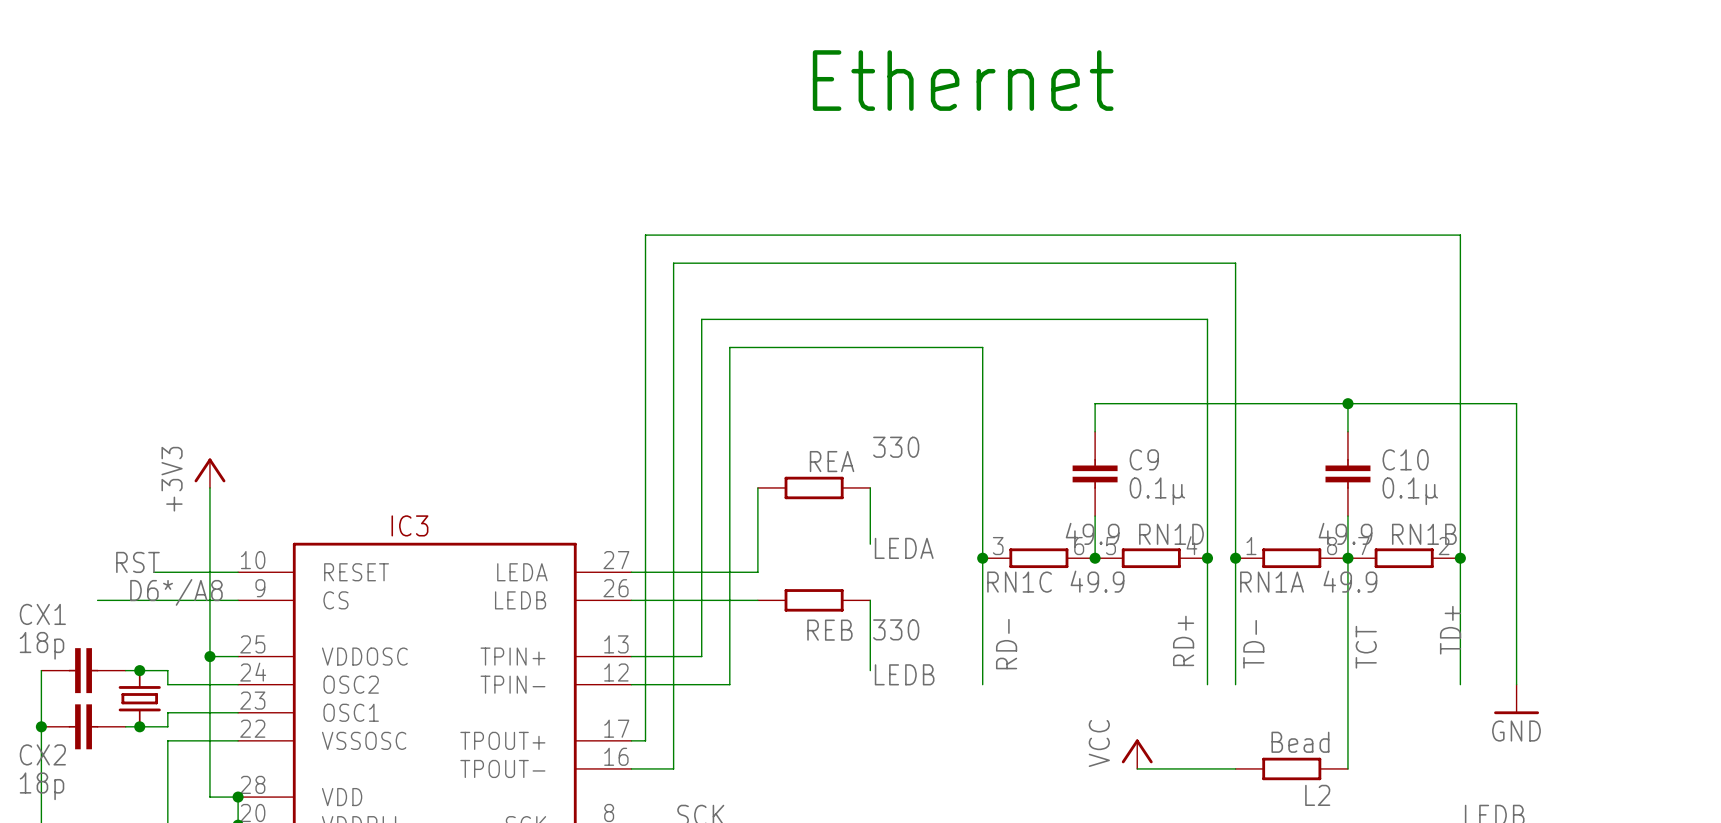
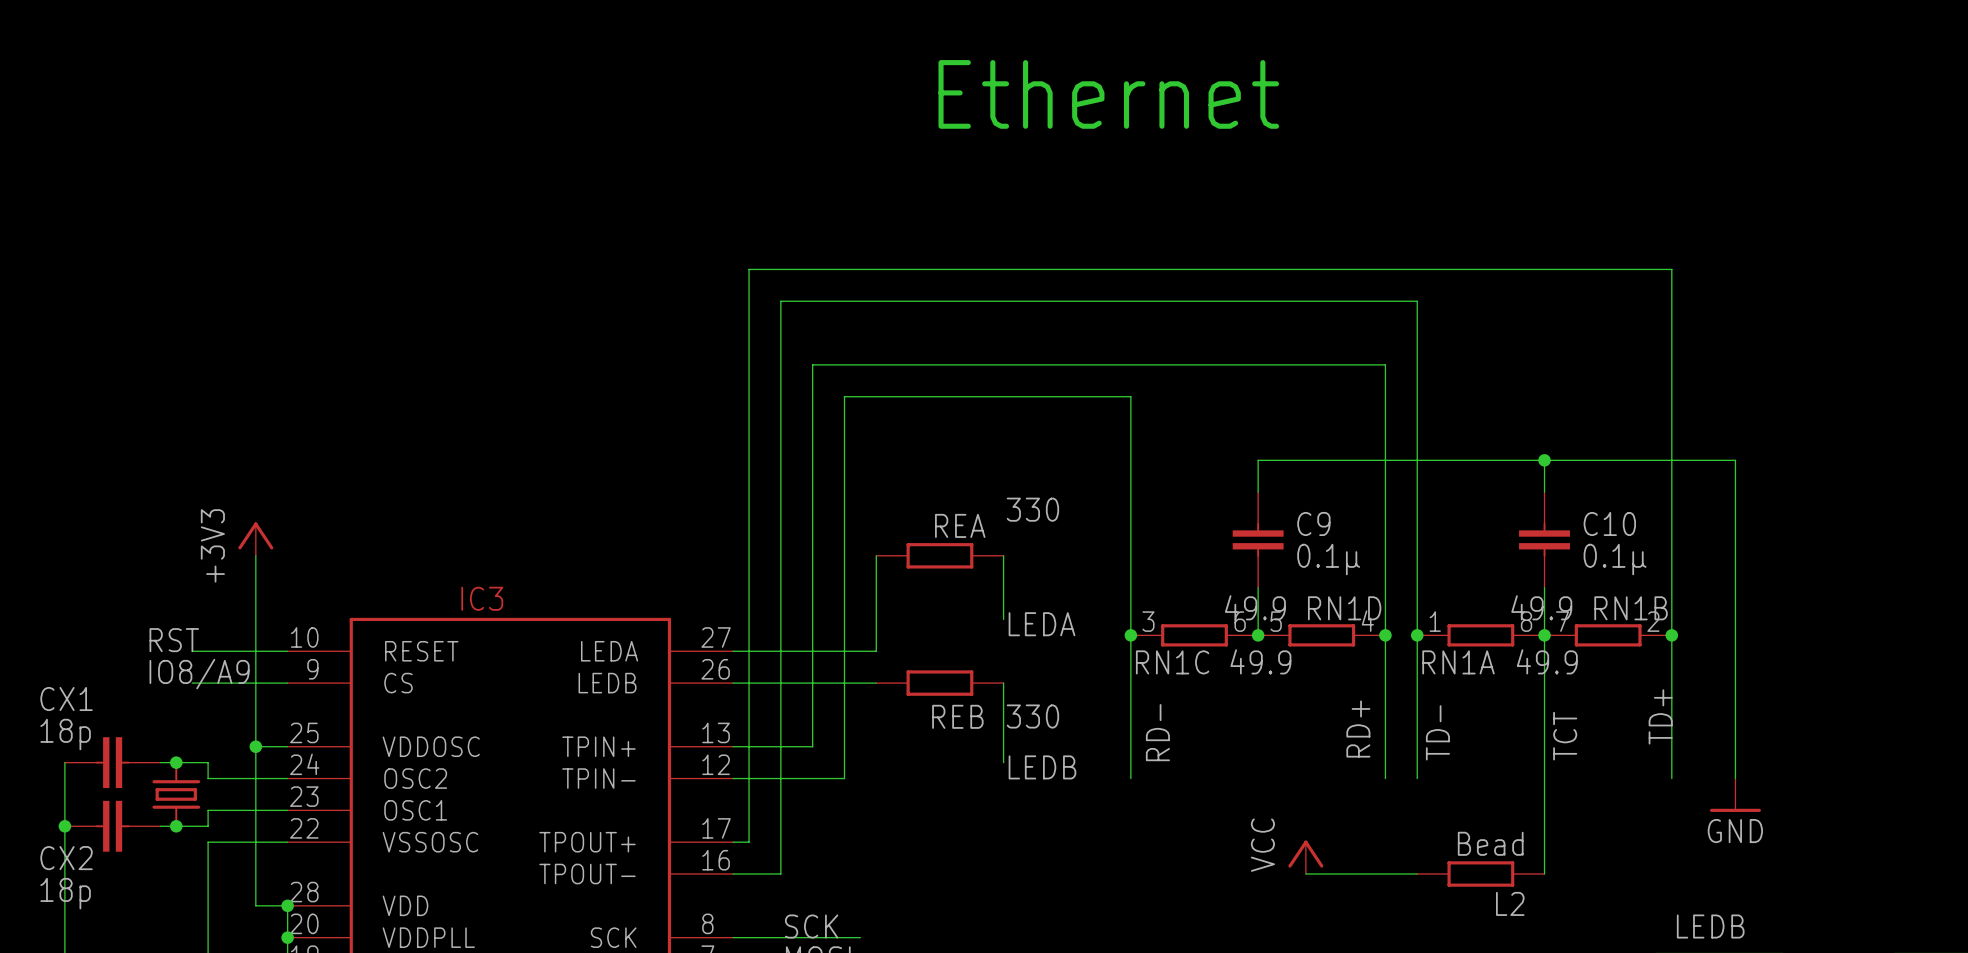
label: none -> IO8/A9 (199, 674)
label: D6*/A8 (176, 592) -> none
wire: (97, 600) (153, 600) -> none

